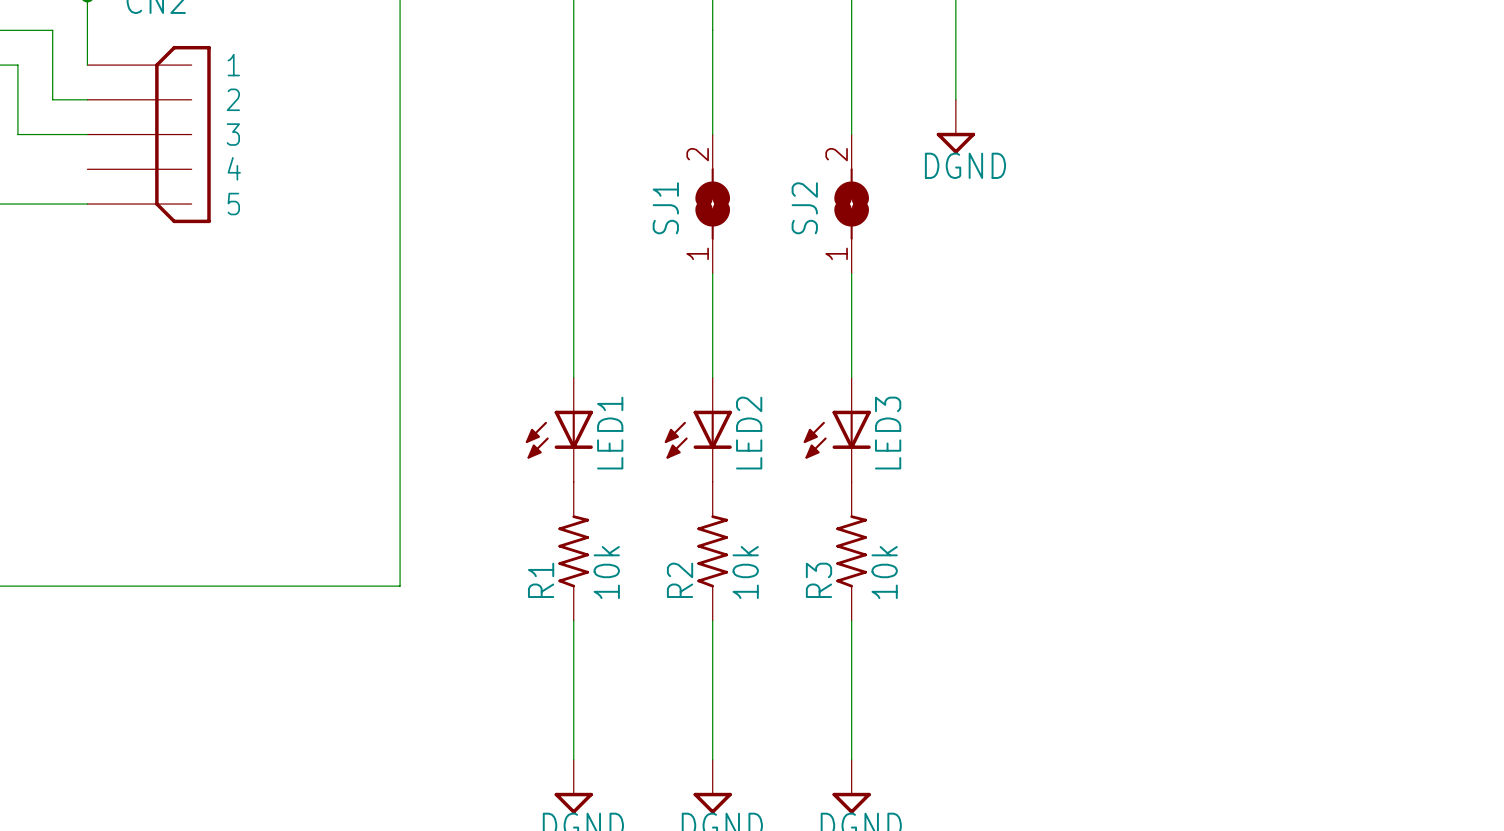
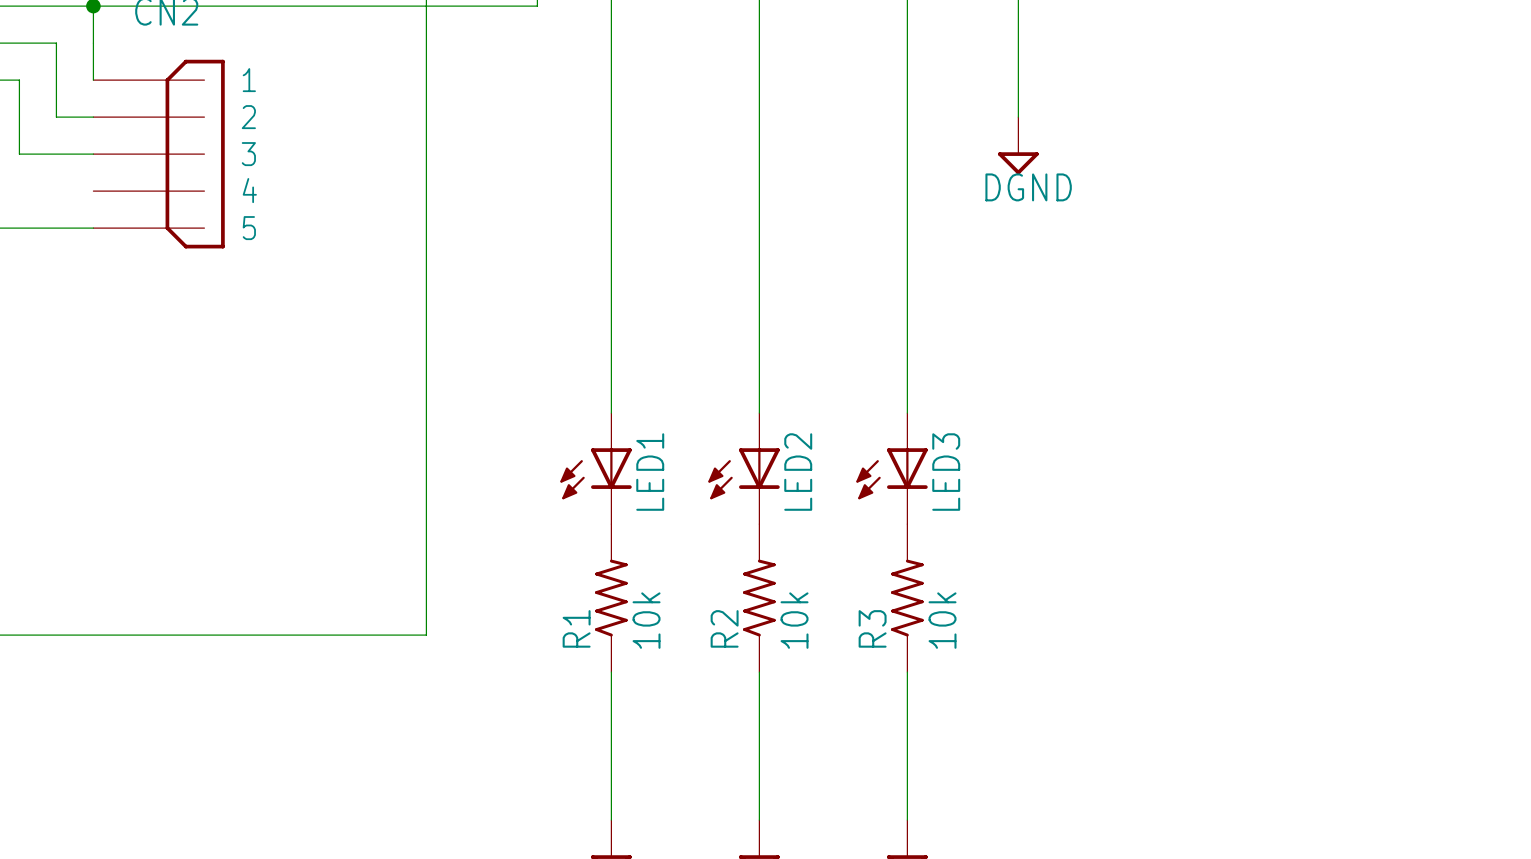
SJ1: (712, 204) -> none
SJ2: (851, 204) -> none

